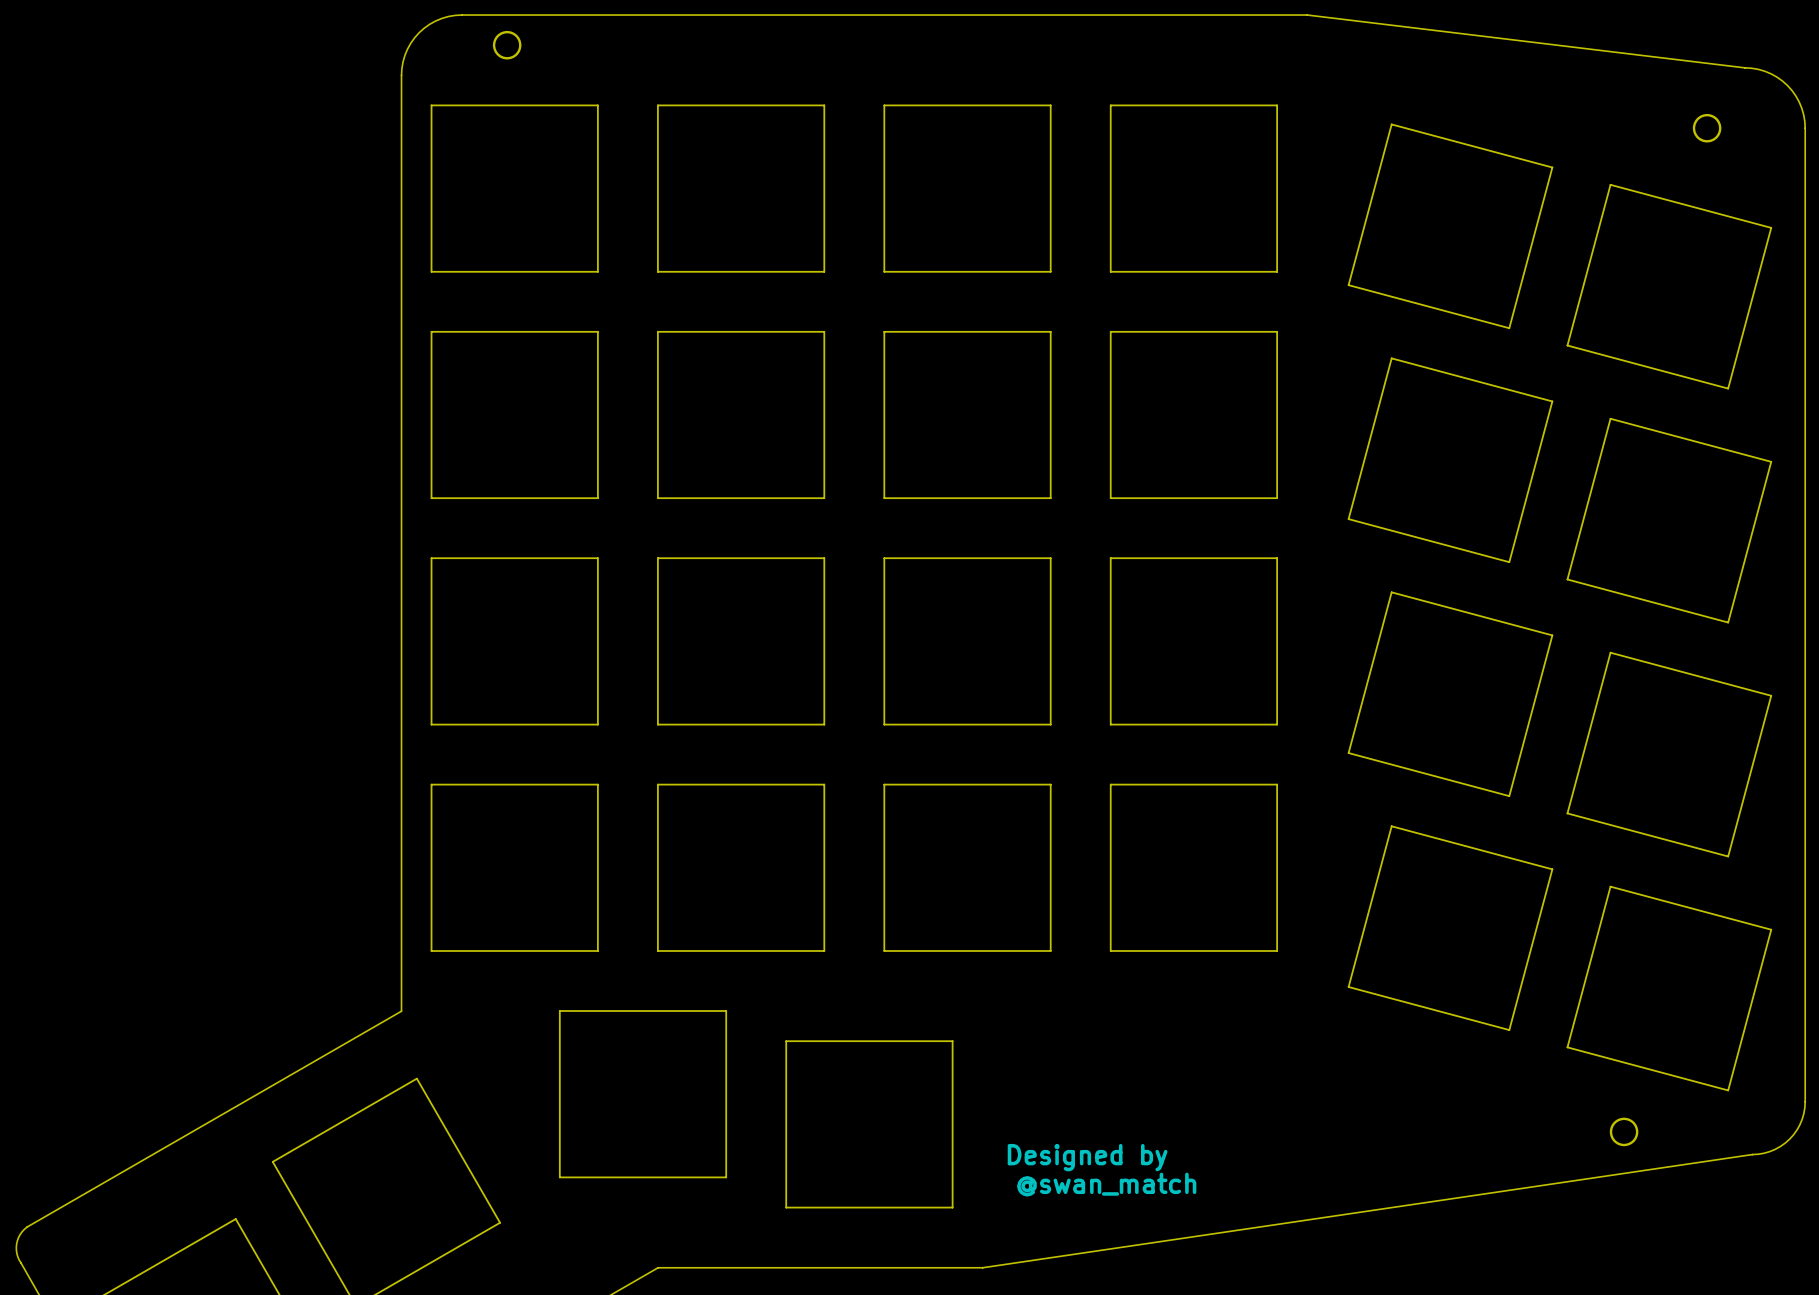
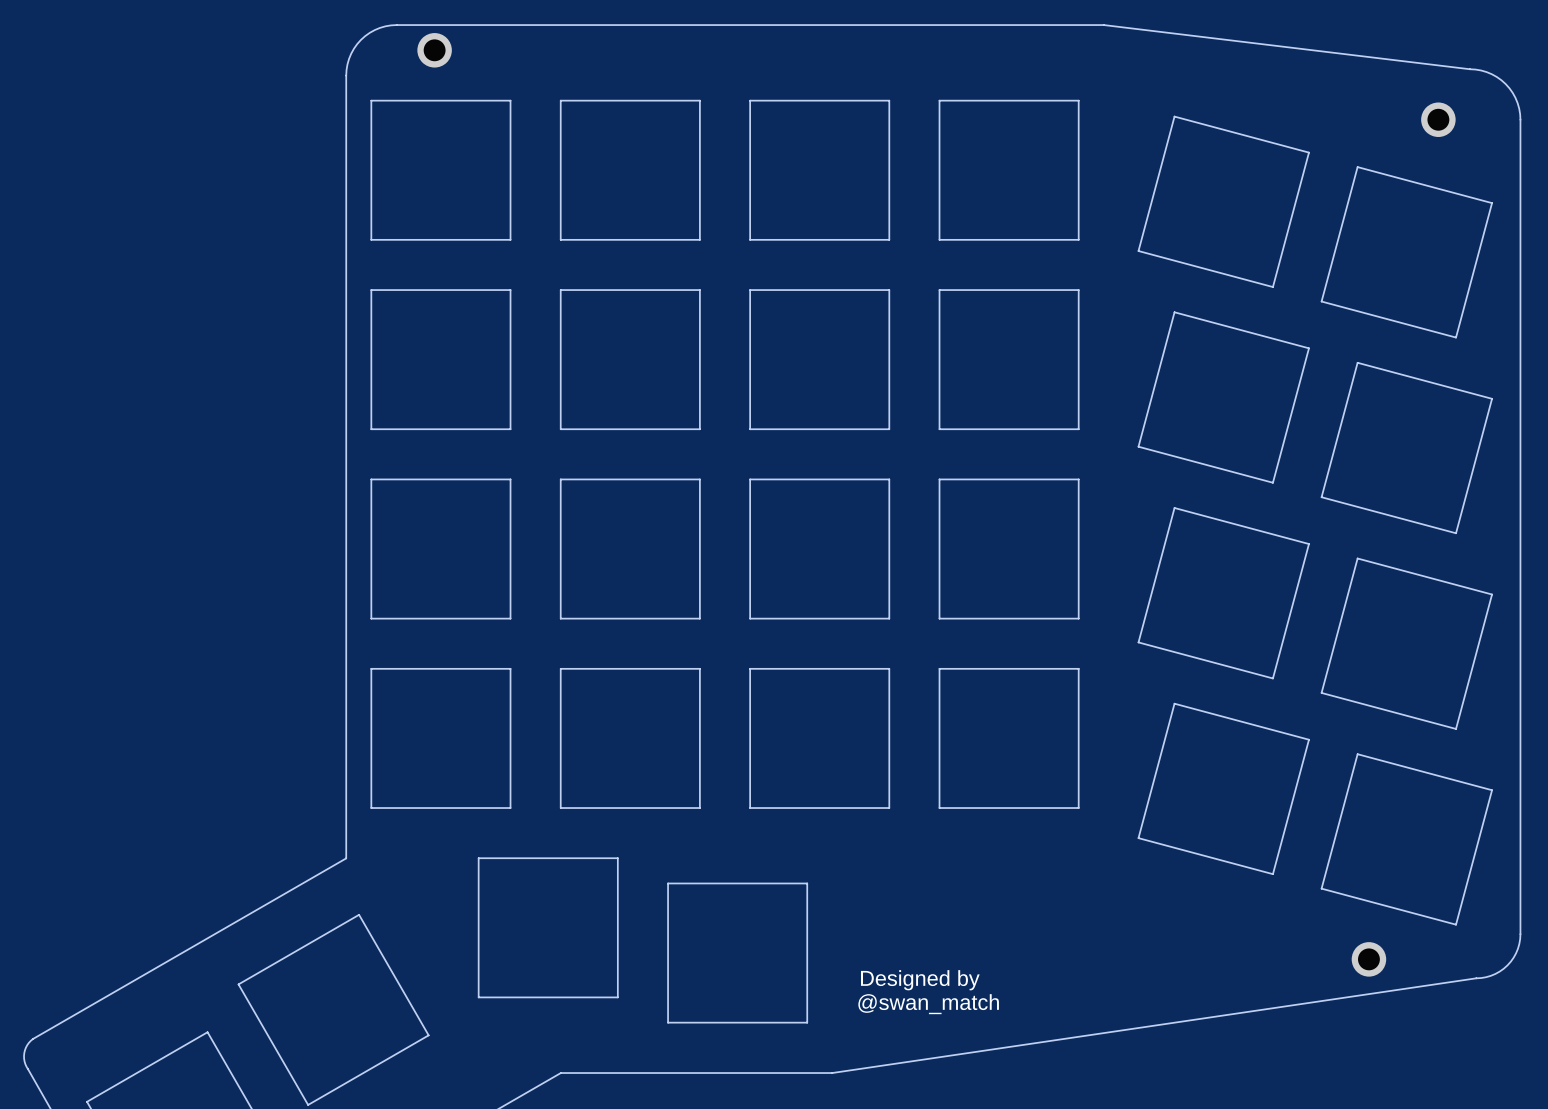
round board edge: [492, 30, 522, 60] -> none
part: none -> (434, 50)
round board edge: [1692, 113, 1722, 143] -> none
part: none -> (1438, 119)
round board edge: [1609, 1117, 1639, 1147] -> none
part: none -> (1368, 959)

